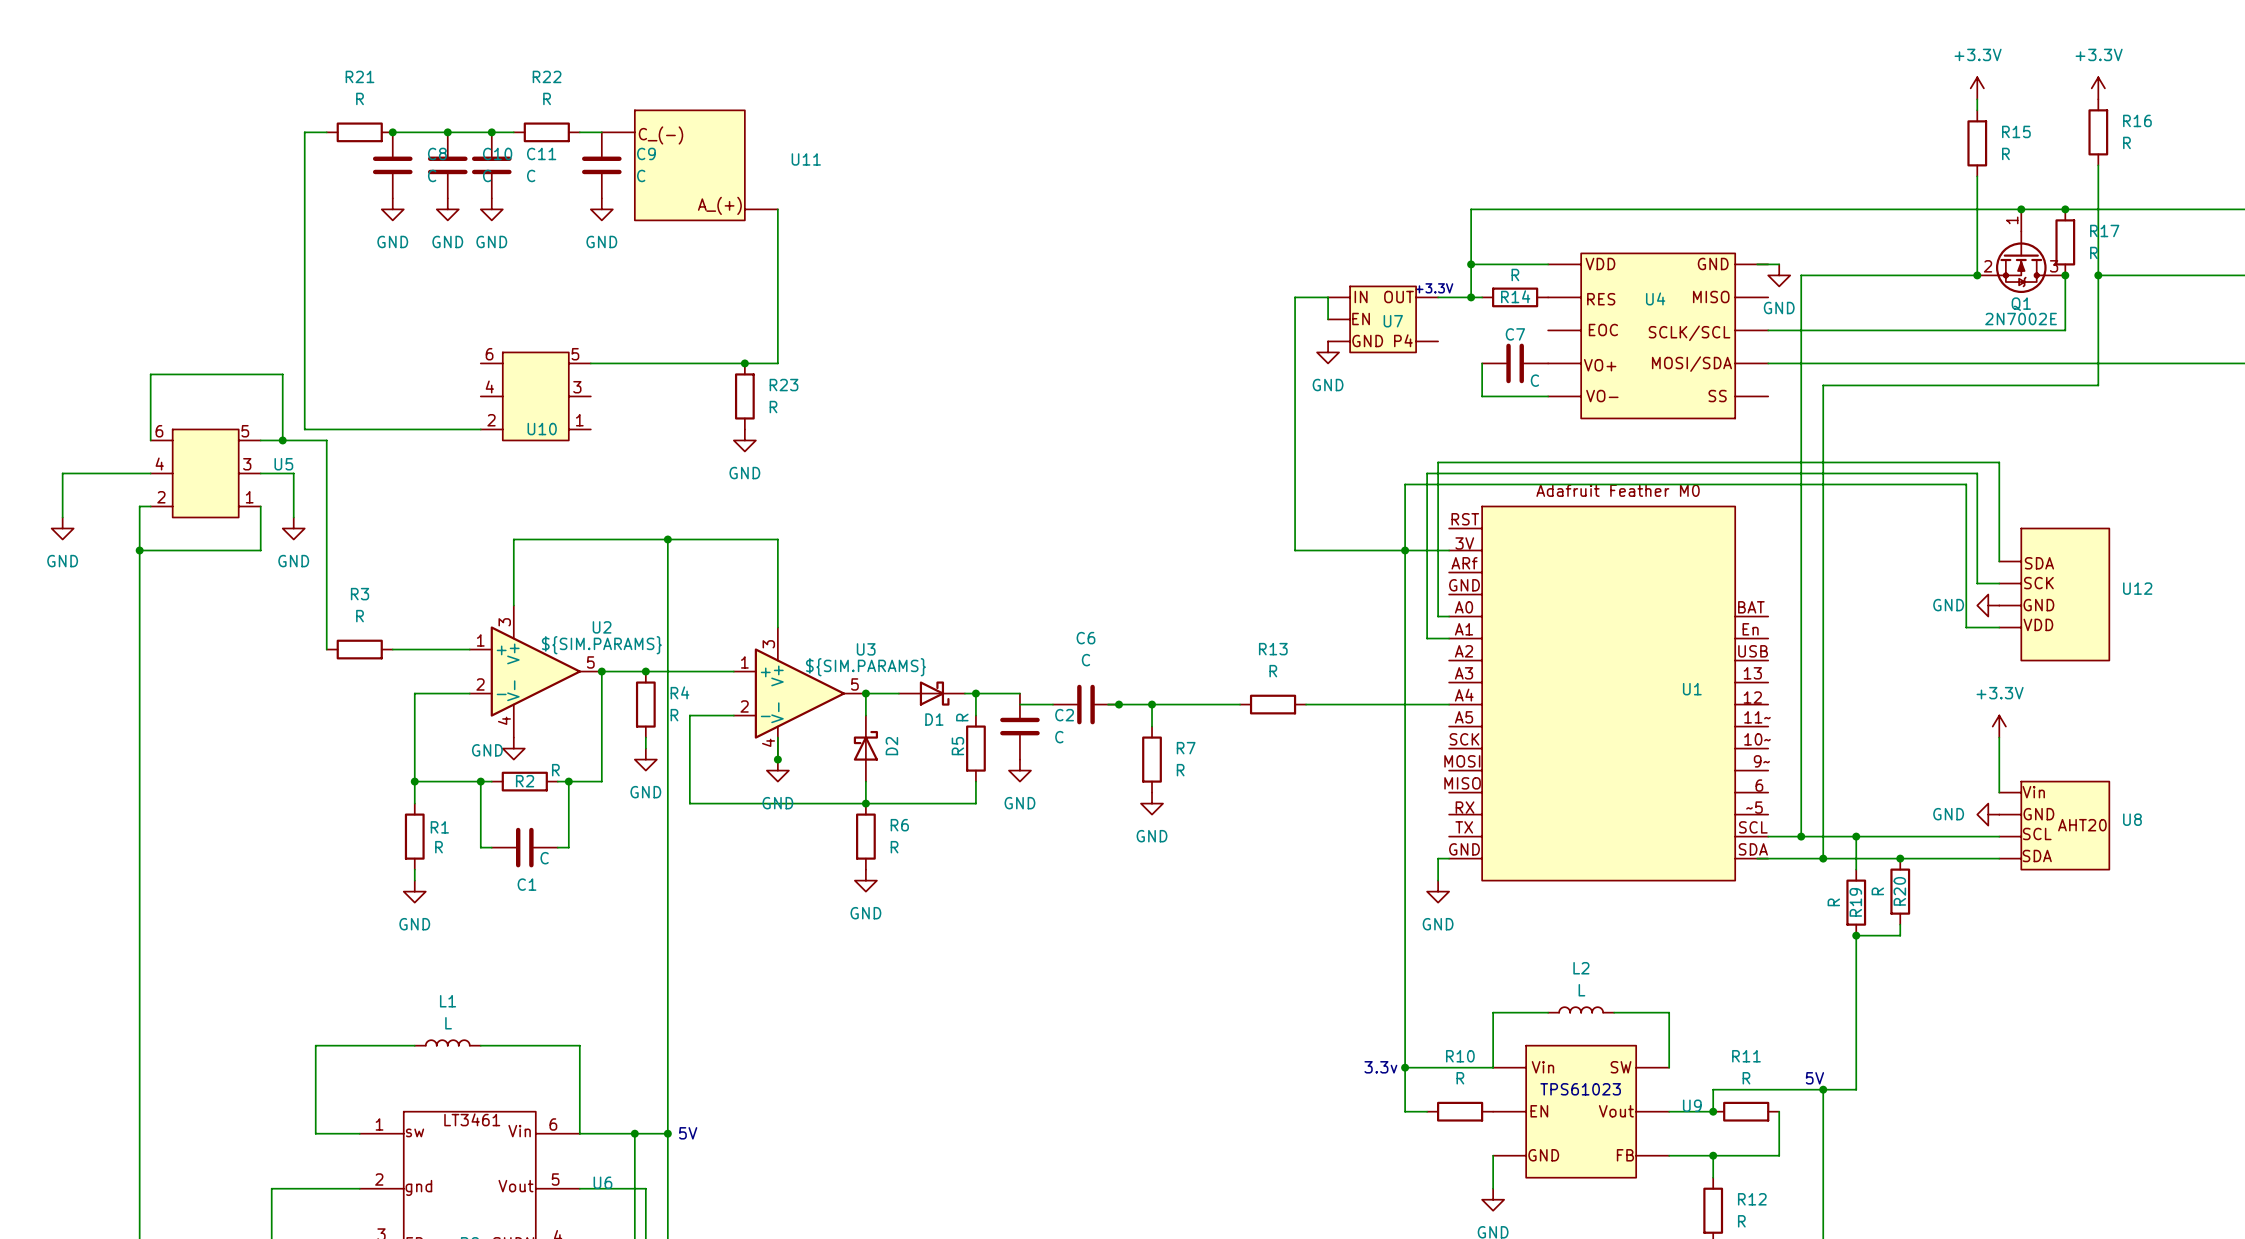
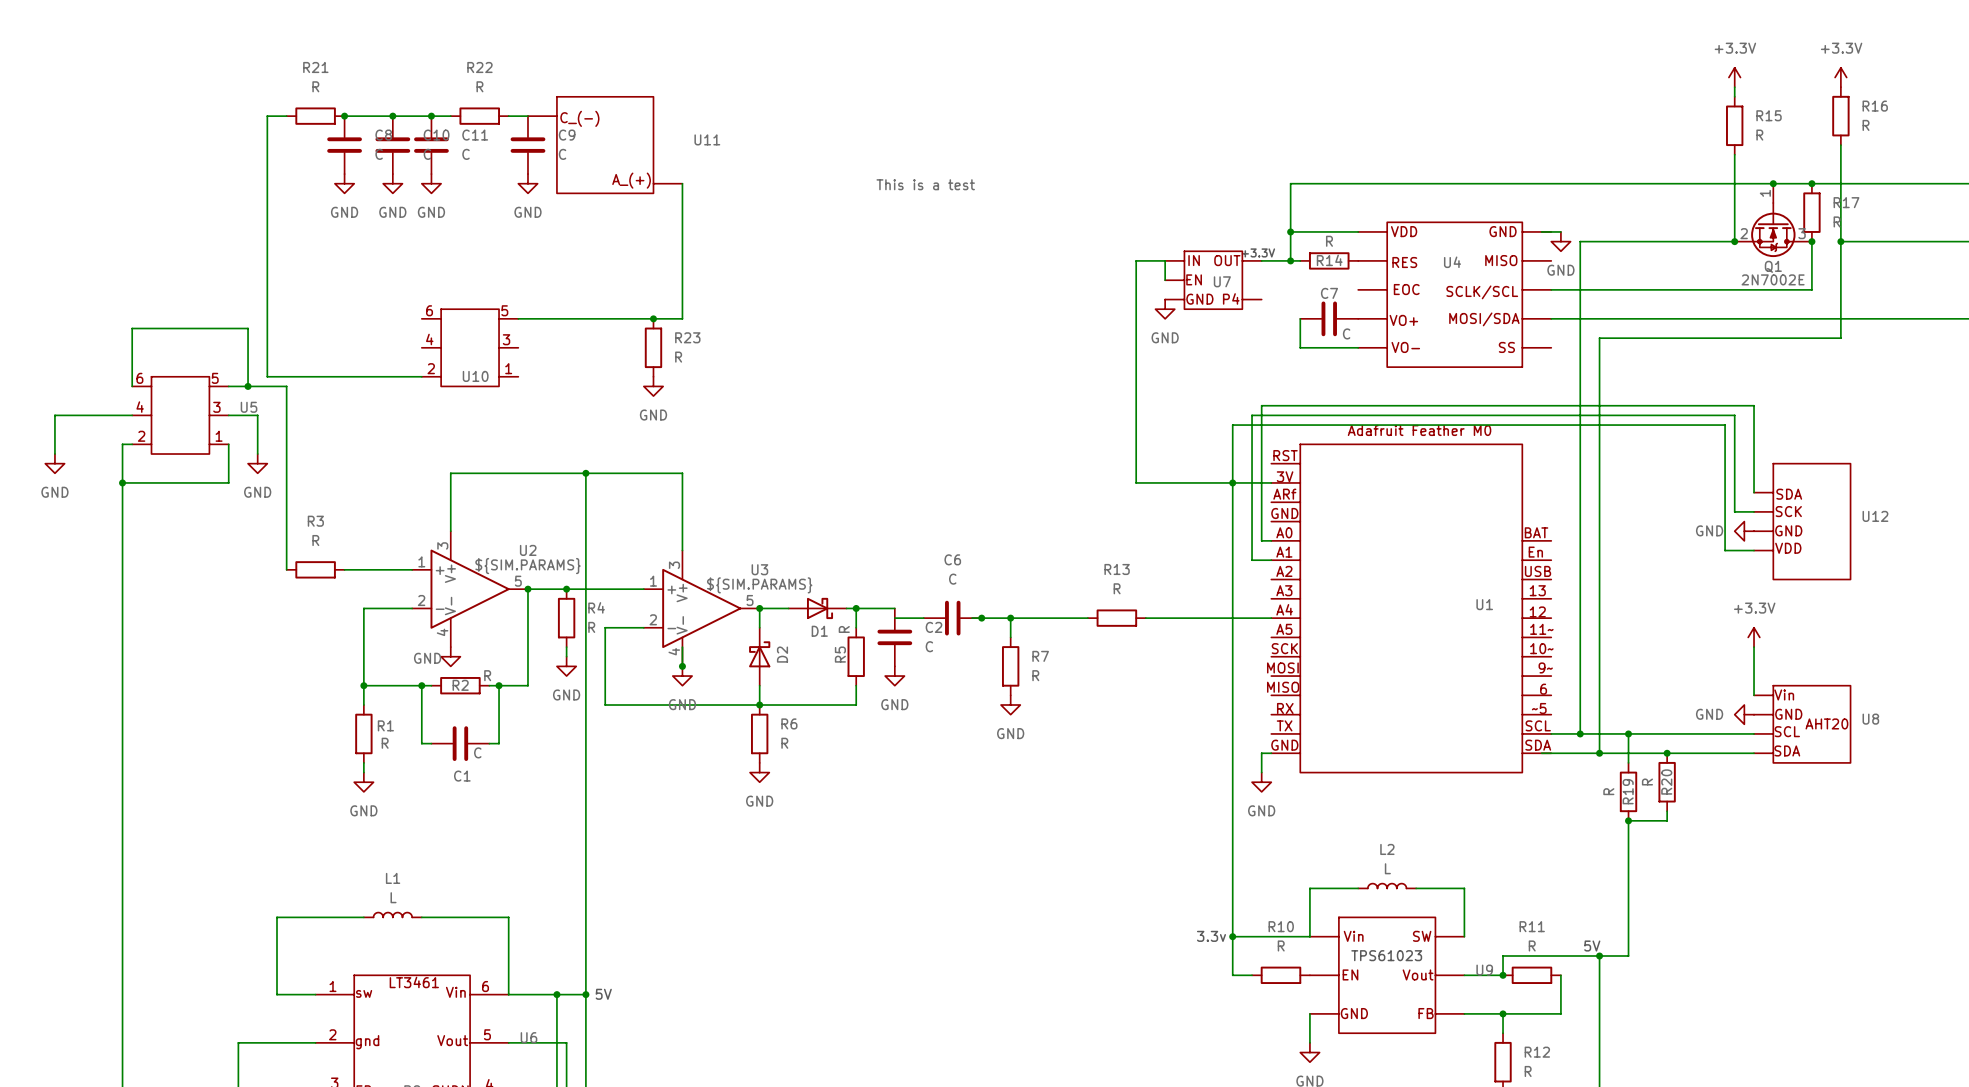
label: none -> This is a test (925, 184)

